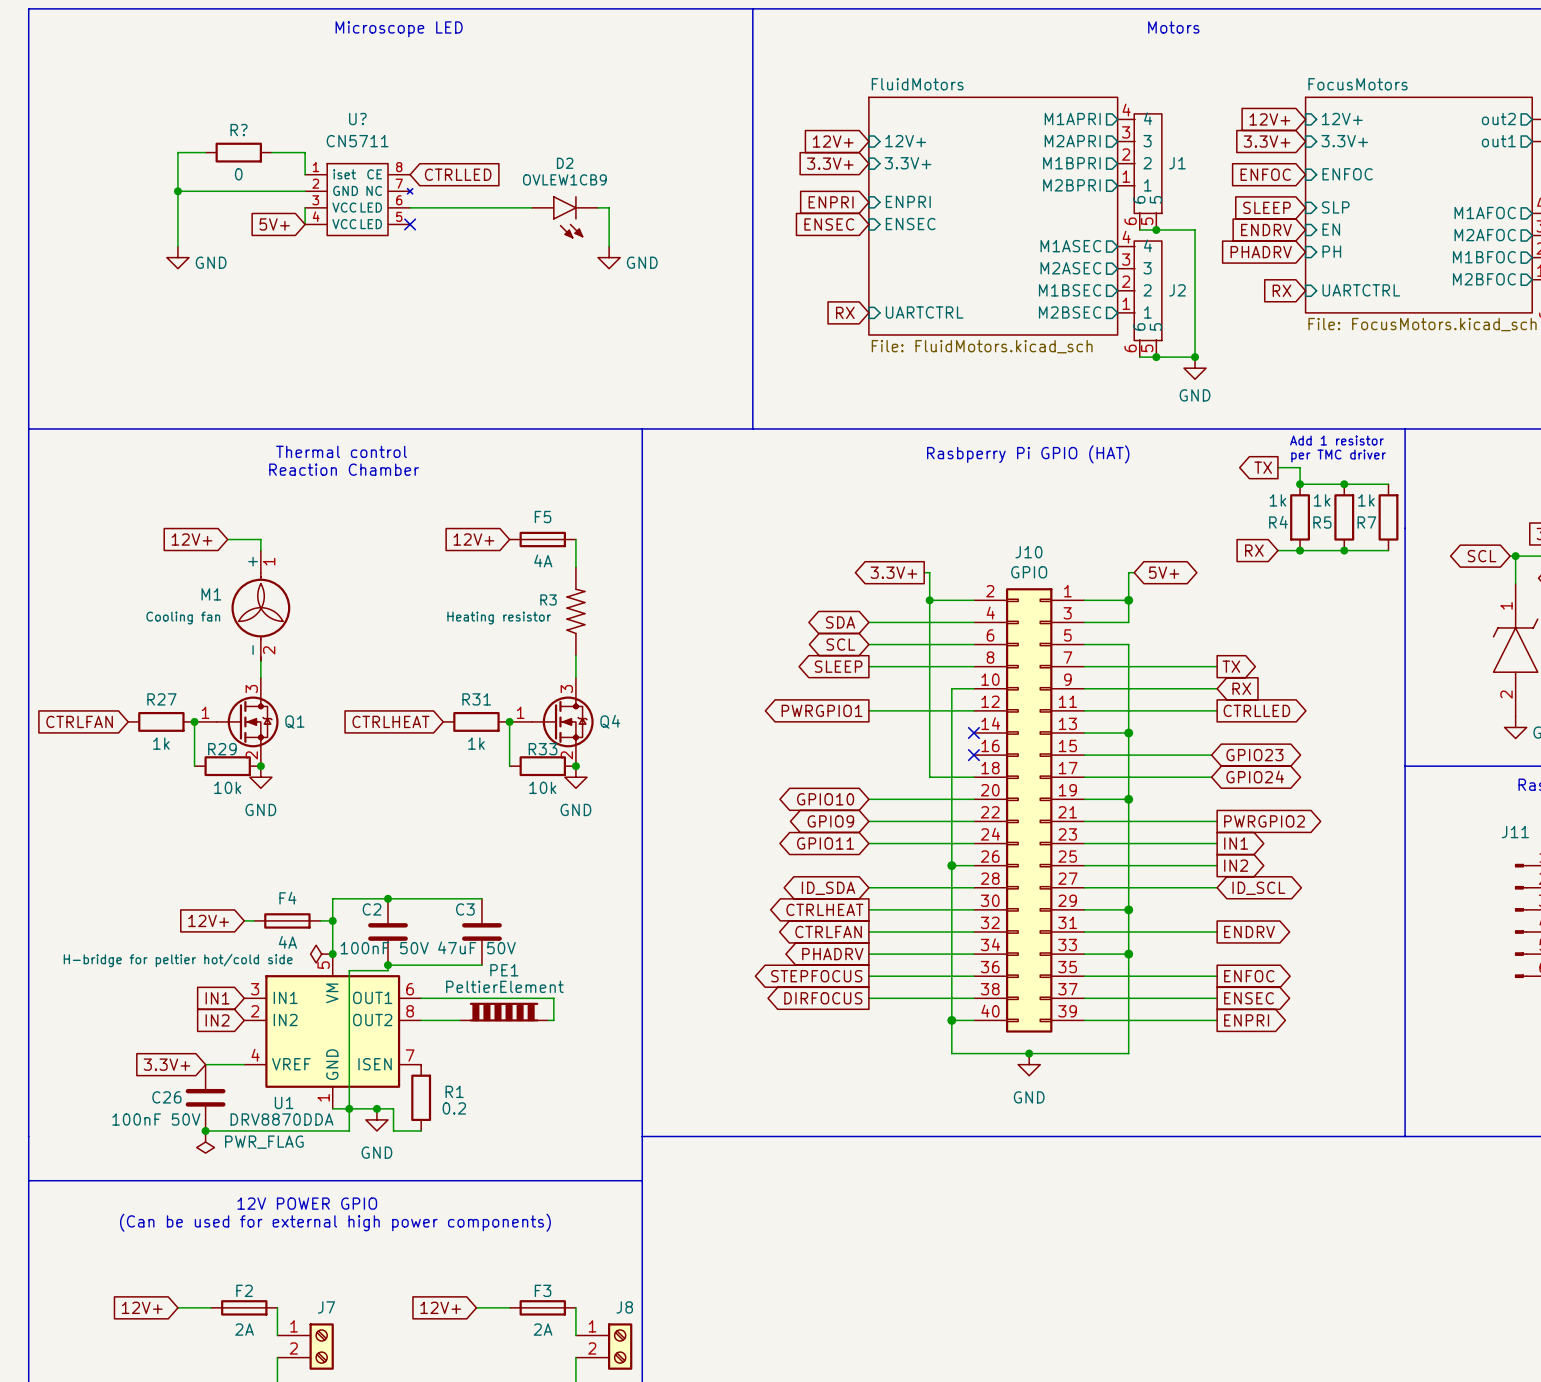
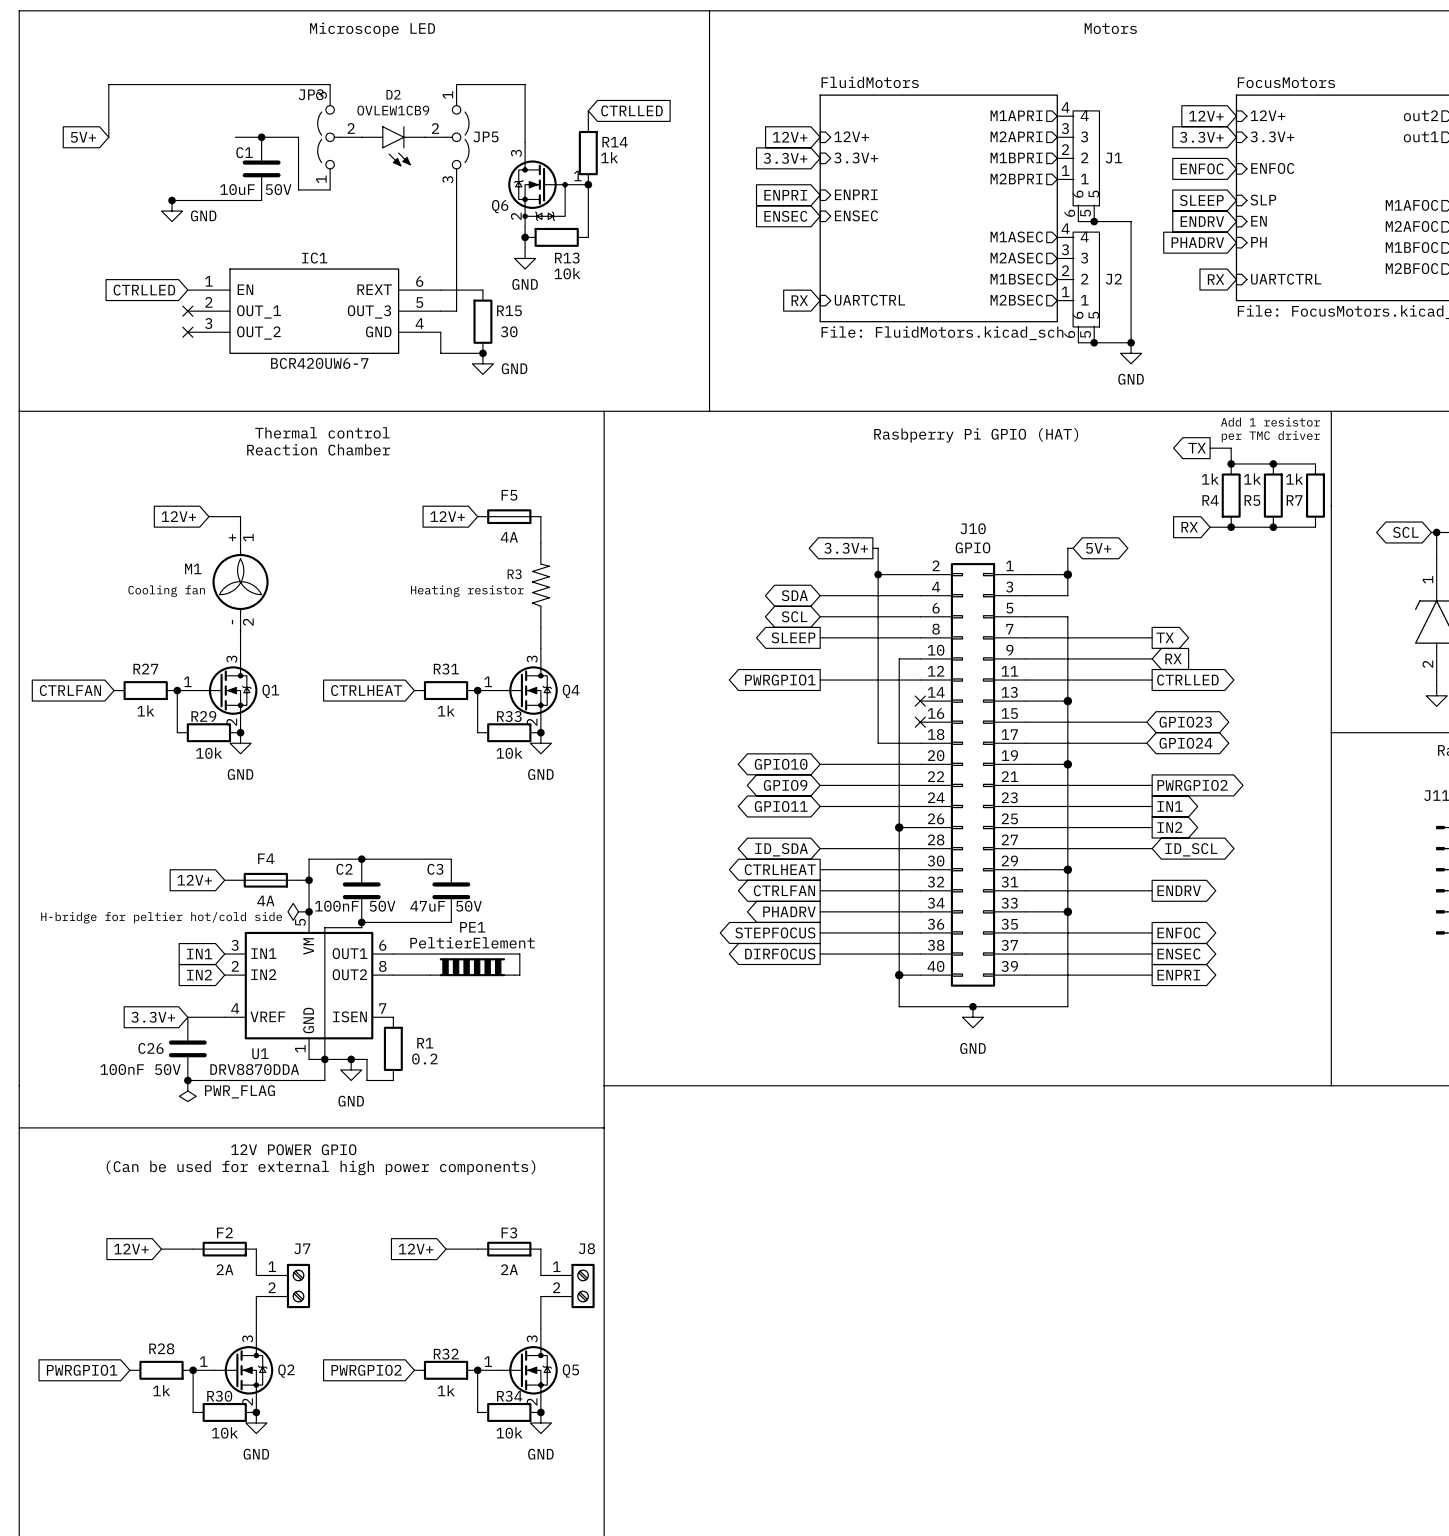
wire: none -> (330, 84) (108, 84) (108, 137)
wire: none -> (456, 84) (525, 84) (525, 142)
wire: none -> (588, 110) (588, 121)
global label: none -> CTRLLED (631, 110)
wire: none -> (235, 137) (298, 137) (298, 189) (330, 189)
junction: none -> (261, 137)
JP3: none -> (339, 137)
JP5: none -> (447, 137)
wire: (205, 152) (177, 152) (177, 246) -> none
R?: 0 (238, 152) -> none
wire: (271, 152) (305, 152) (305, 174) -> none
R14: none -> 1k (588, 153)
C1: none -> 10uF 50V (261, 168)
global label: CTRLLED (458, 174) -> none
wire: (177, 191) (305, 191) -> none
junction position: (177, 191) -> (172, 200)
Q6: none -> (548, 184)
wire: none -> (588, 184) (588, 237)
junction: none -> (588, 184)
wire: none -> (456, 189) (456, 311) (440, 311)
U?: CN5711 (358, 199) -> none
wire: none -> (172, 200) (261, 200)
wire: (305, 207) (305, 224) -> none
wire: (410, 207) (531, 207) -> none
wire: (598, 207) (609, 207) (609, 246) -> none
D2 position: (564, 217) -> (393, 146)
global label position: 5V+ (274, 224) -> 5V+ (83, 137)
no-connect mark: (410, 224) -> none
wire: none -> (525, 226) (525, 247)
junction: none -> (525, 237)
R13: none -> 10k (556, 237)
power symbol position: GND (177, 257) -> GND (172, 211)
power symbol position: GND (609, 257) -> GND (525, 258)
power symbol text position: GND (642, 262) -> GND (525, 284)
global label: none -> CTRLLED (144, 290)
wire: none -> (440, 290) (482, 290)
no-connect mark: none -> (187, 311)
IC1: none -> BCR420UW6-7 (314, 311)
R15: none -> 30 (482, 321)
no-connect mark: none -> (187, 332)
wire: none -> (440, 332) (440, 353) (482, 353)
junction: none -> (482, 353)
power symbol: none -> GND (482, 363)

